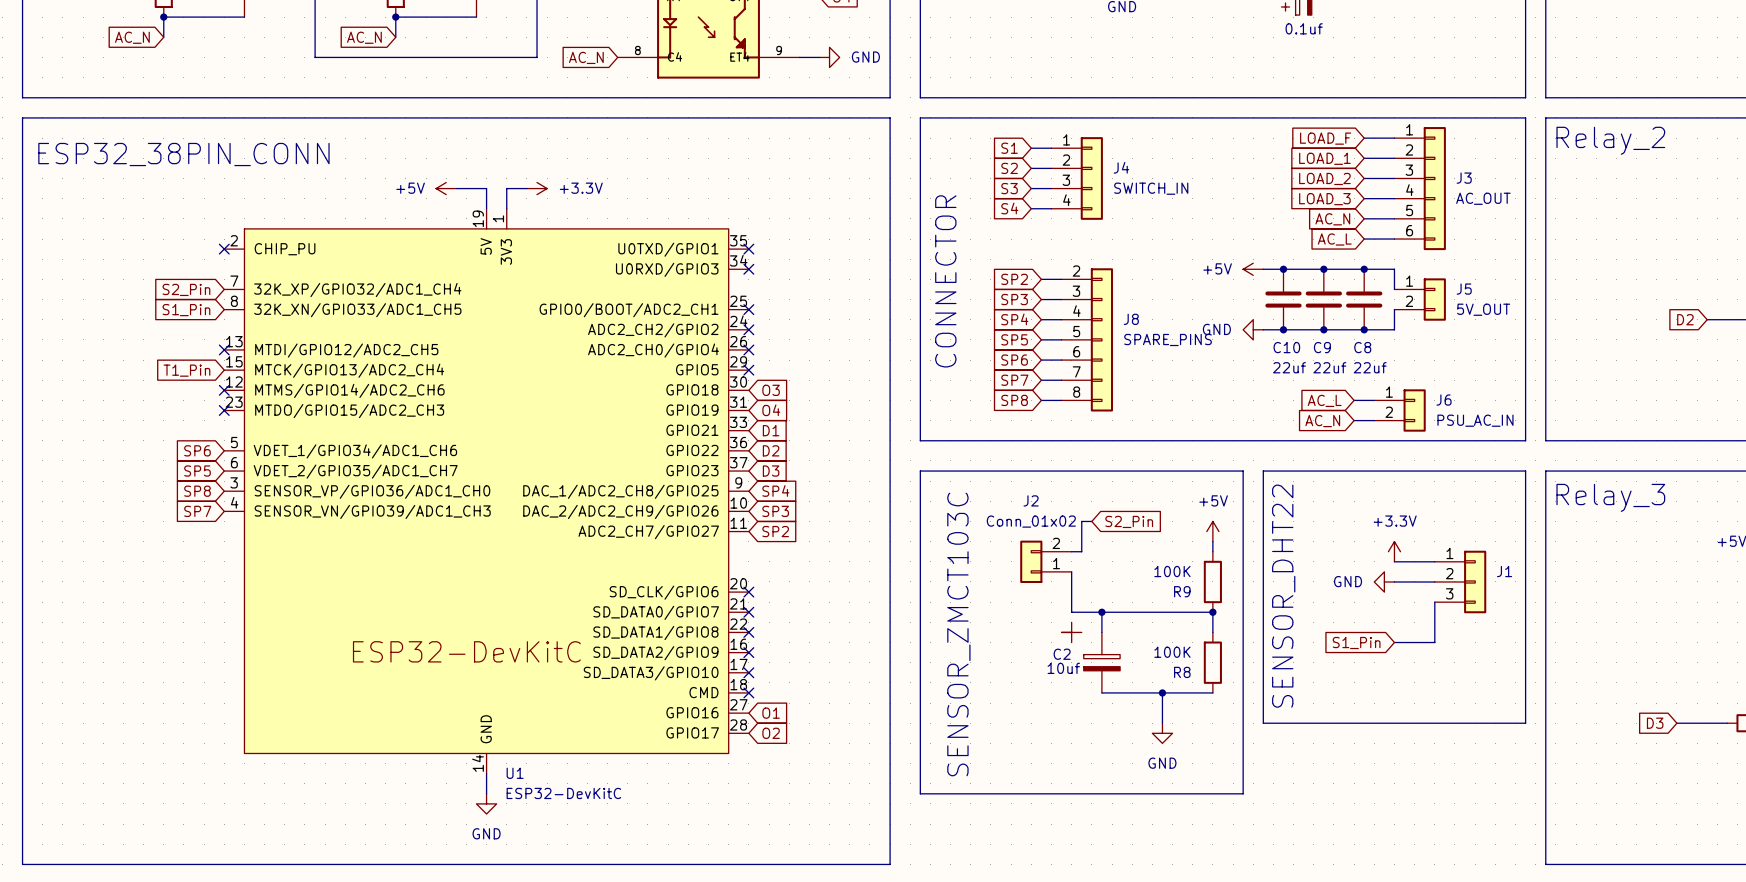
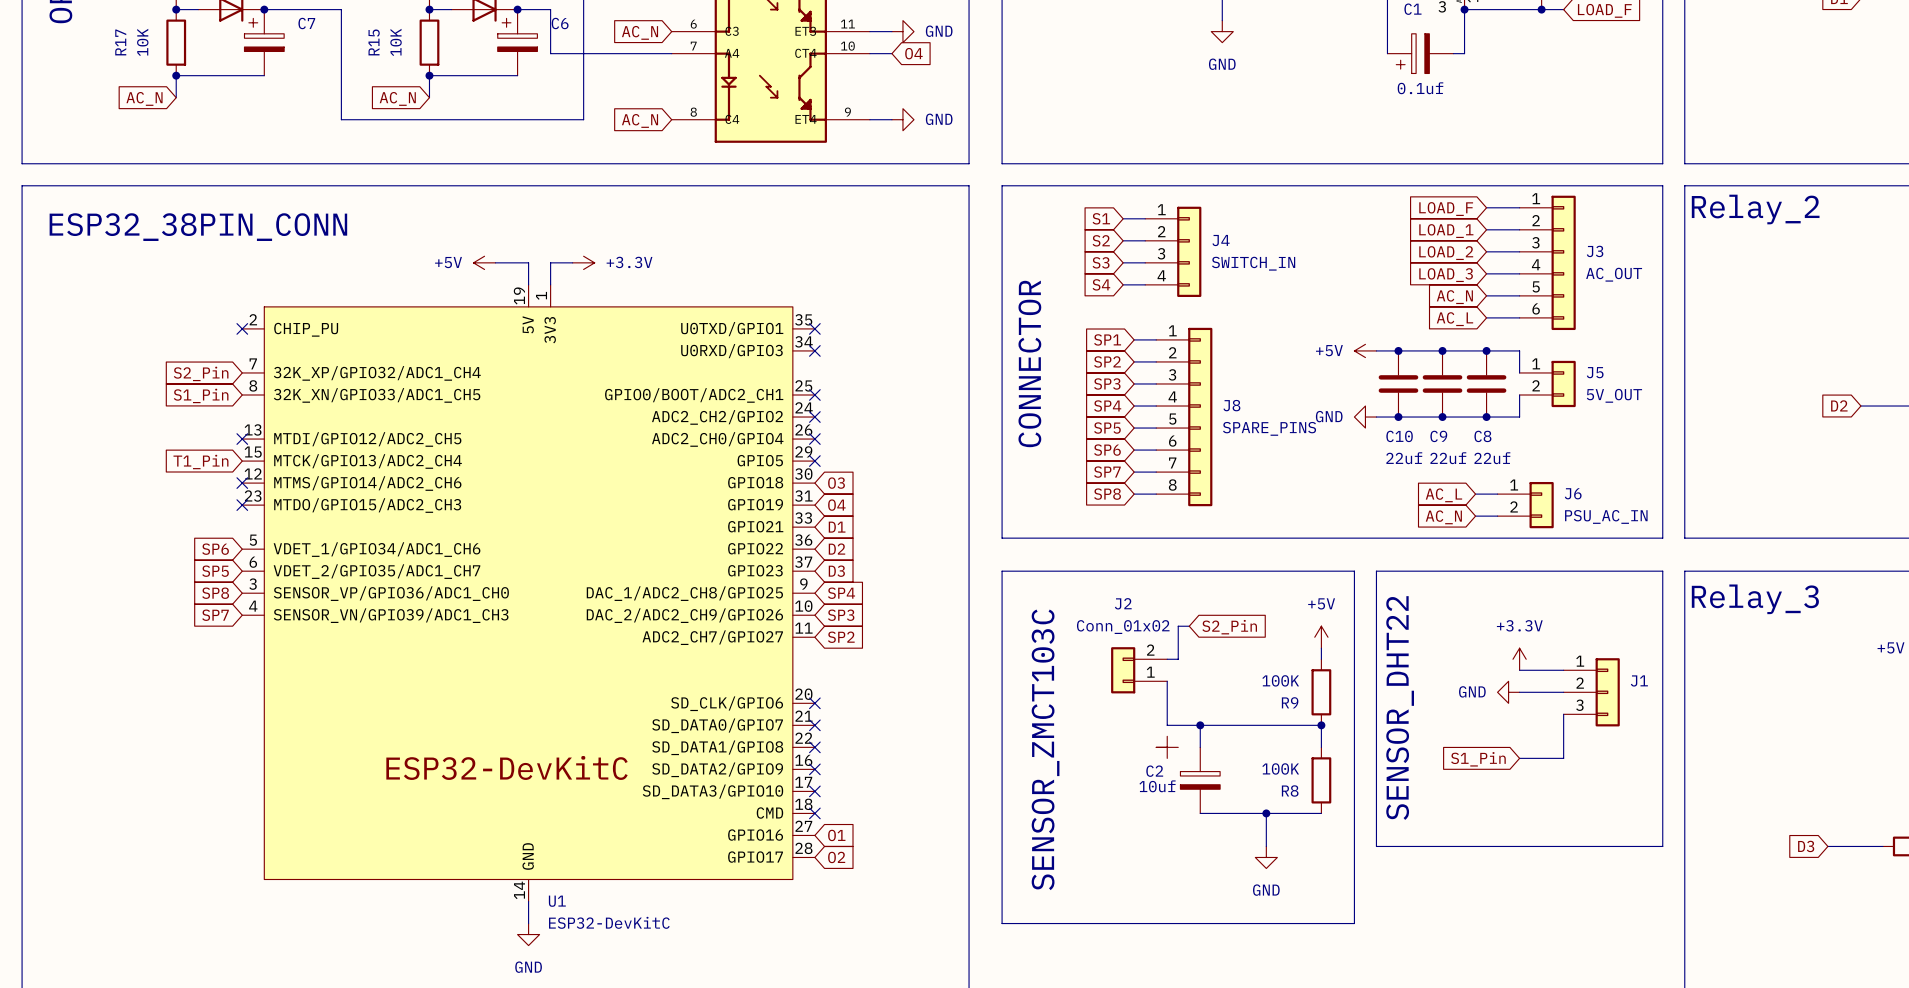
global label: none -> SP1 (1107, 339)
wire: none -> (1134, 339) (1156, 339)
J8 symbol: [1061, 268, 1114, 412] -> [1156, 327, 1213, 507]

